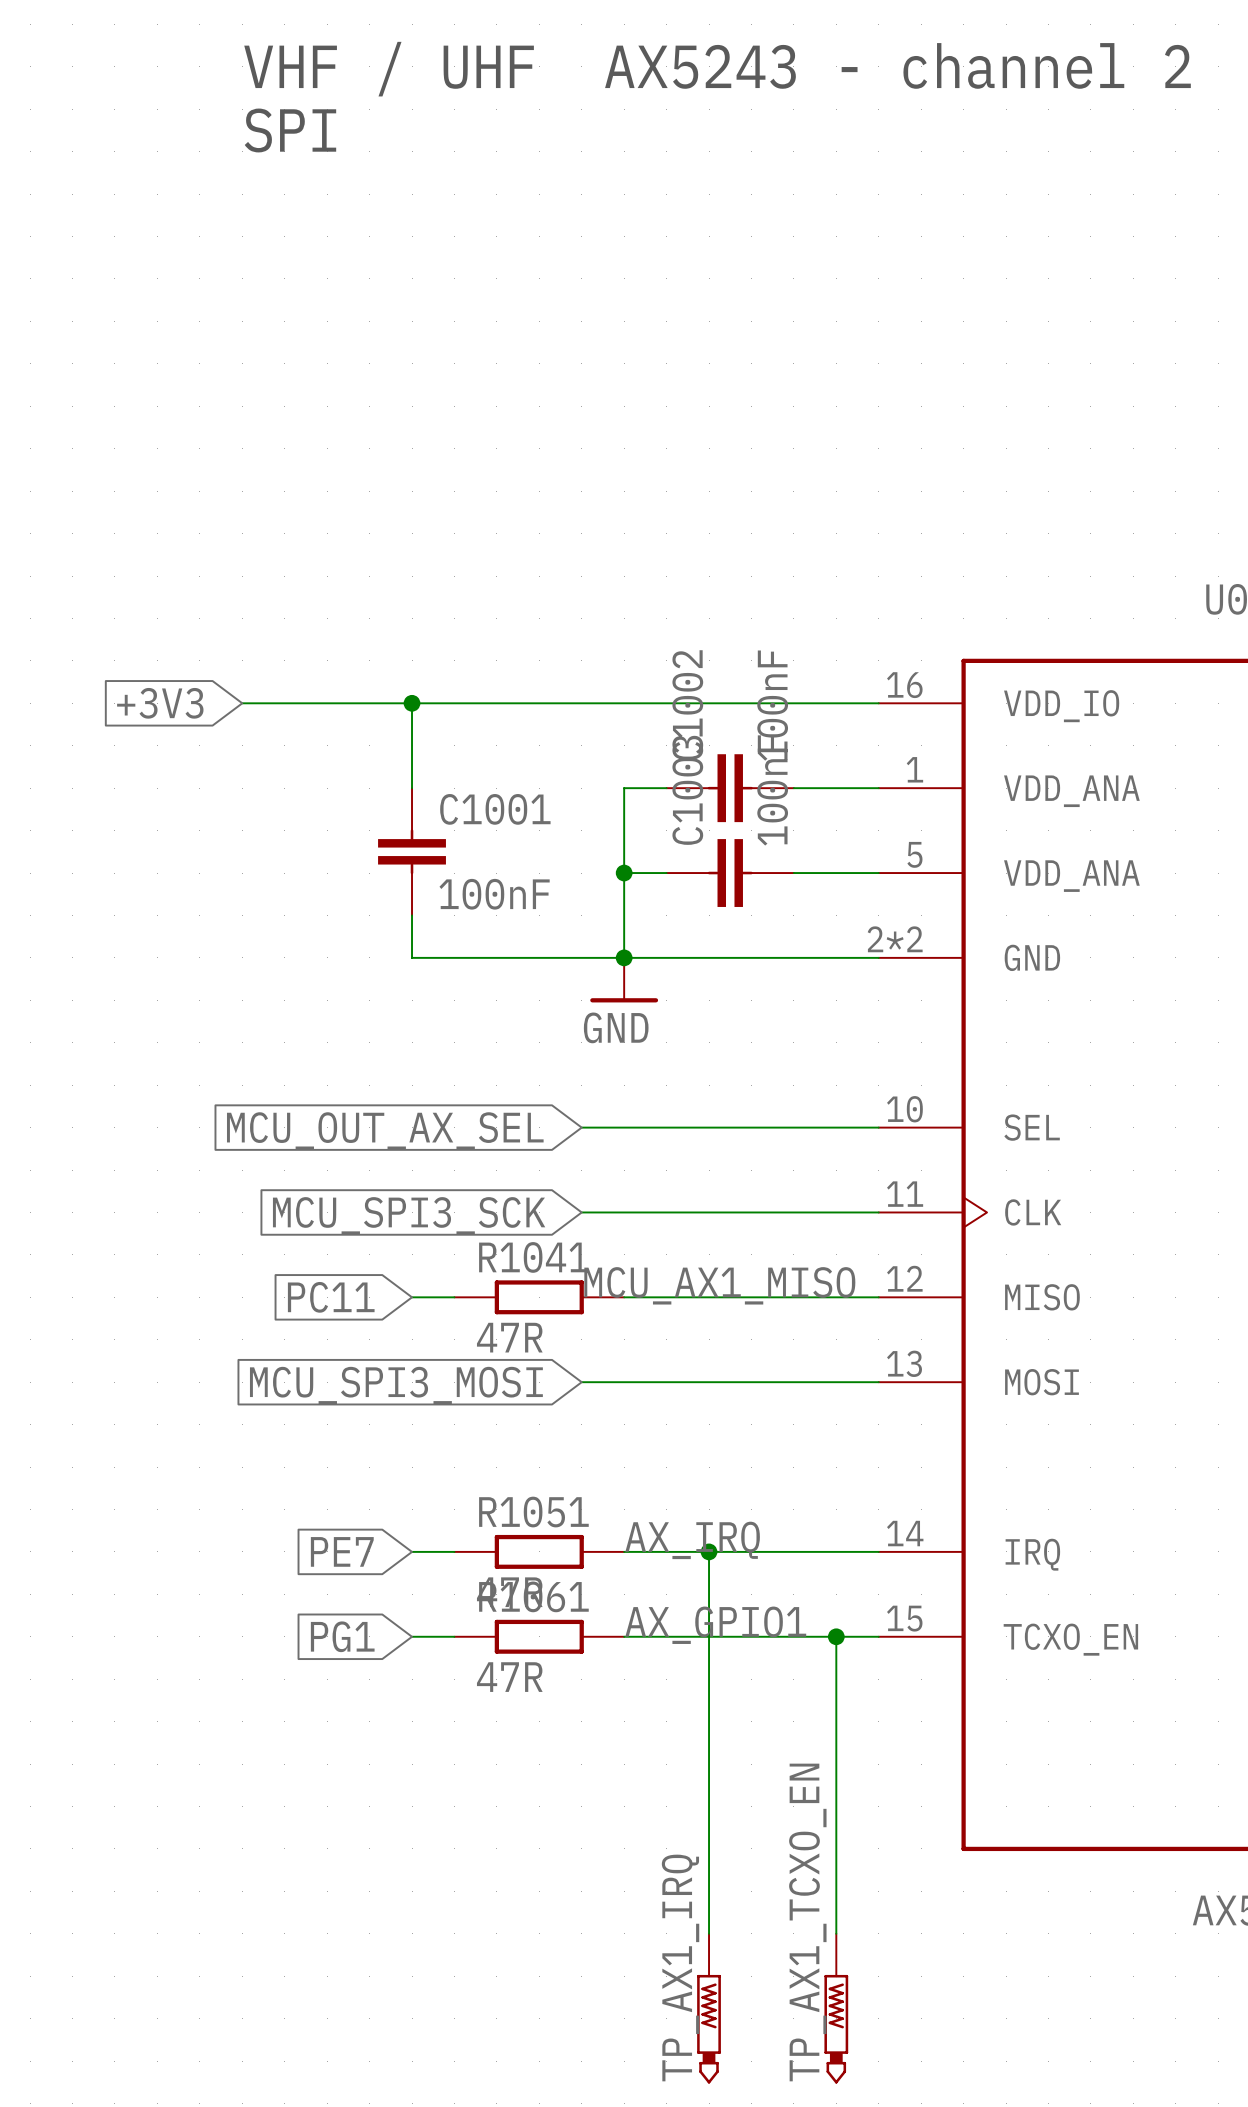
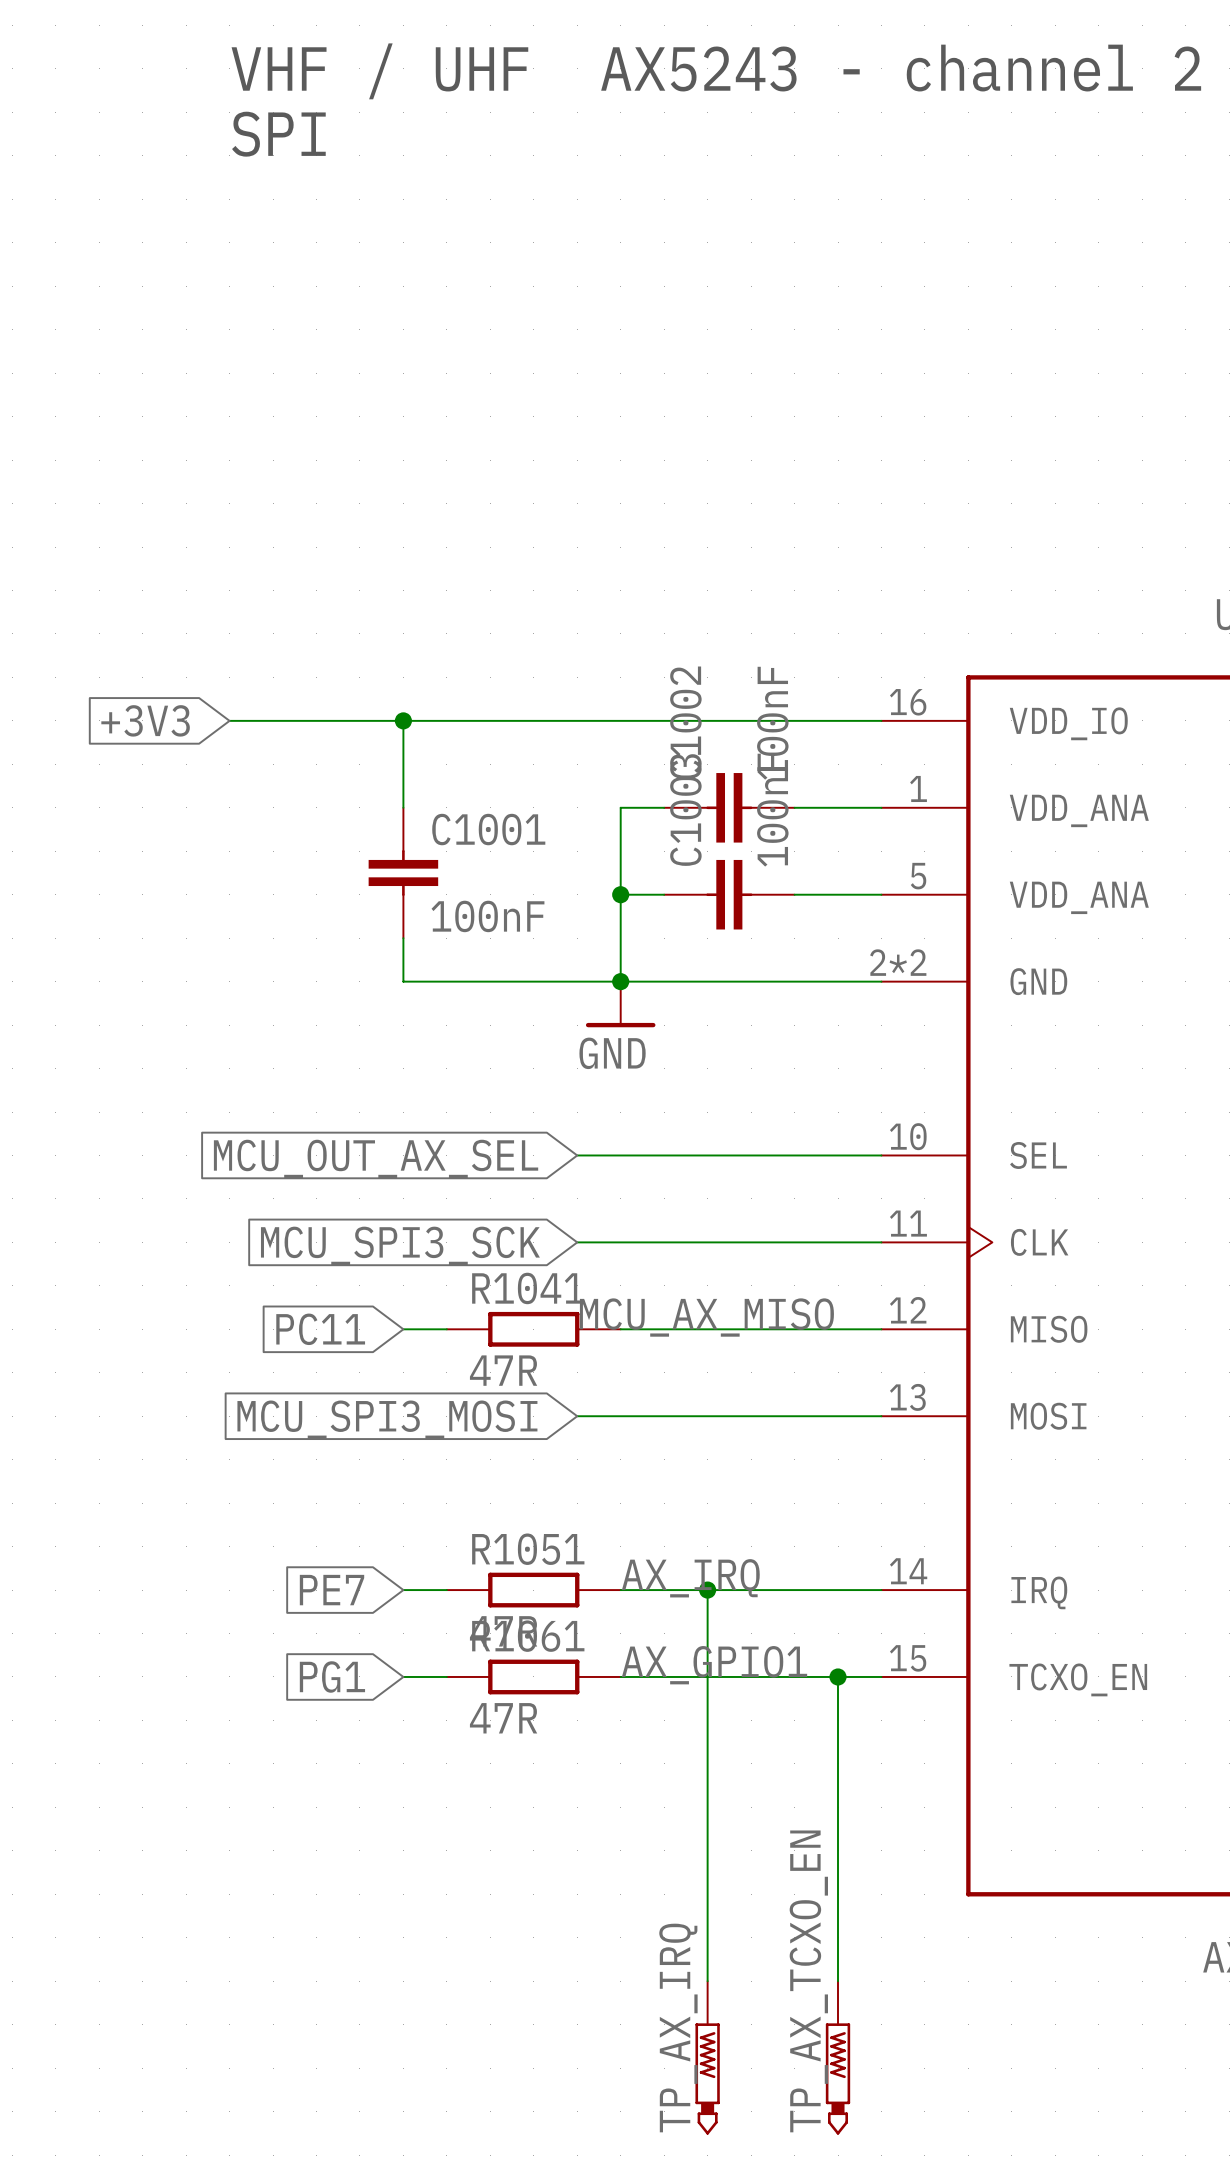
label: MCU_AX1_MISO (719, 1285) -> MCU_AX_MISO (706, 1317)
TP_AX1_TCXO_EN name: TP_AX1_TCXO_EN (807, 1922) -> TP_AX_TCXO_EN (808, 1981)
TP_AX1_IRQ name: TP_AX1_IRQ (680, 1967) -> TP_AX_IRQ (678, 2028)

